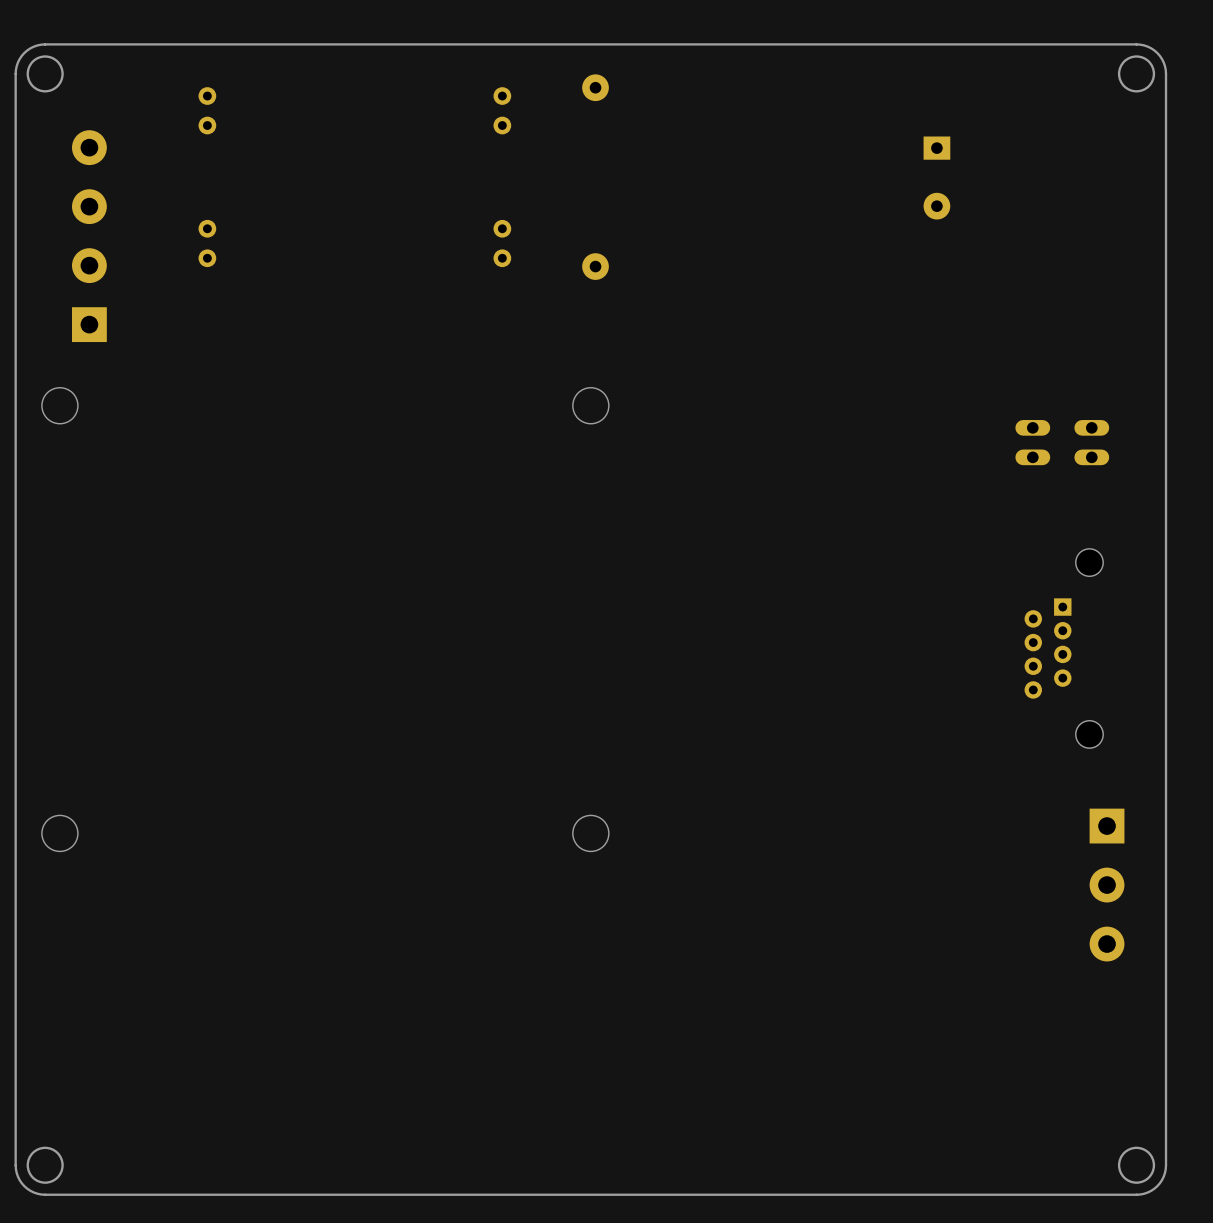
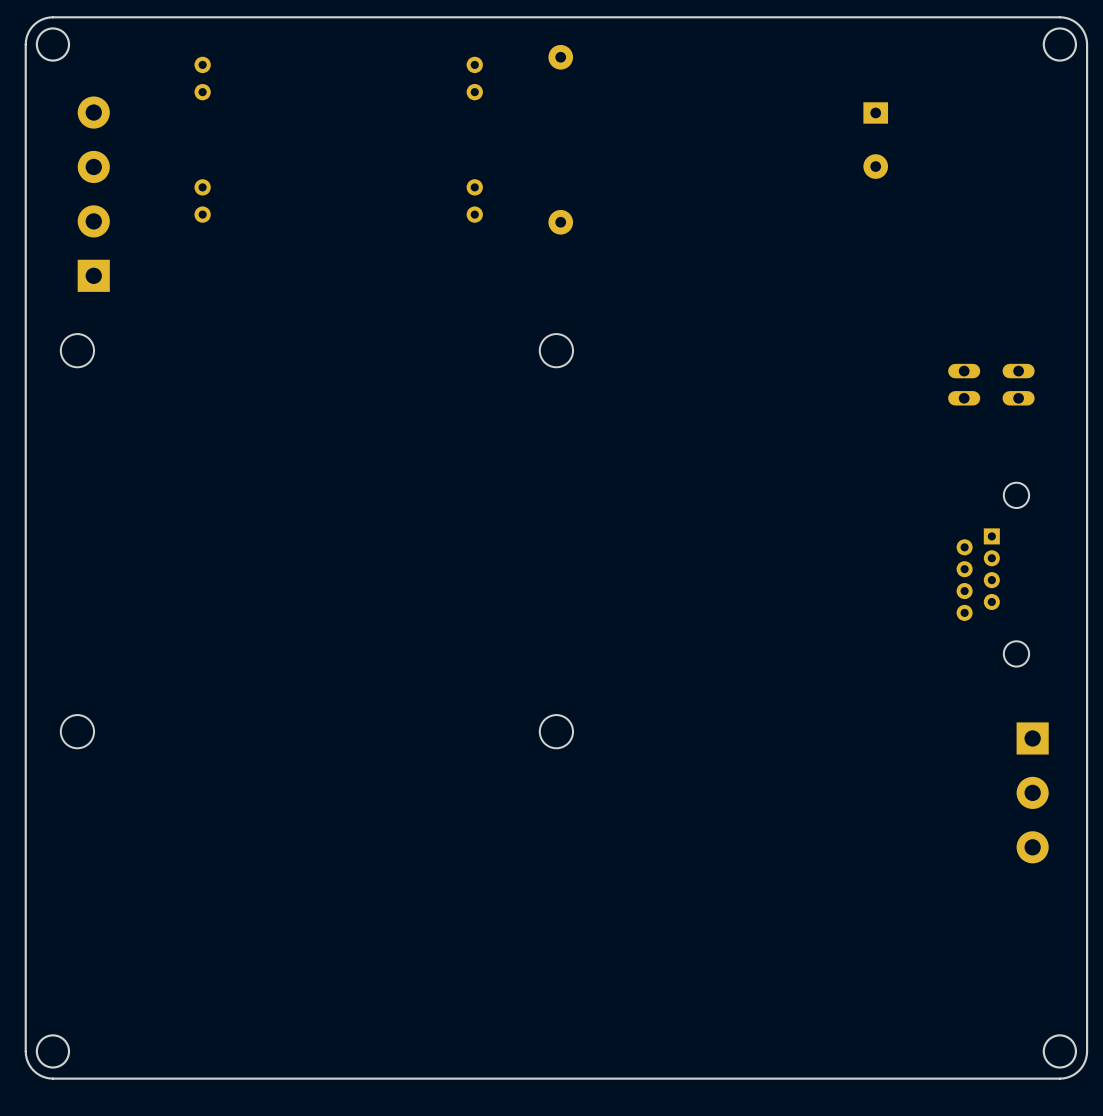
drawing shape: [41, 387, 610, 853] -> [60, 333, 574, 749]

